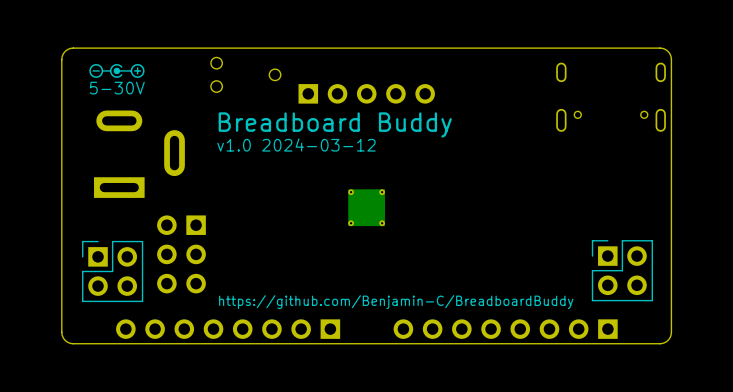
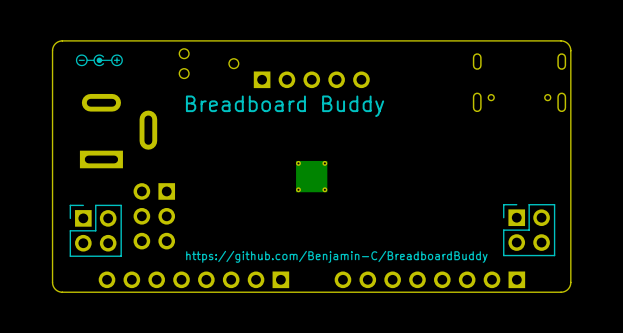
text: 5-30V (117, 88) -> none
text: v1.0 2024-03-12 (296, 144) -> none

